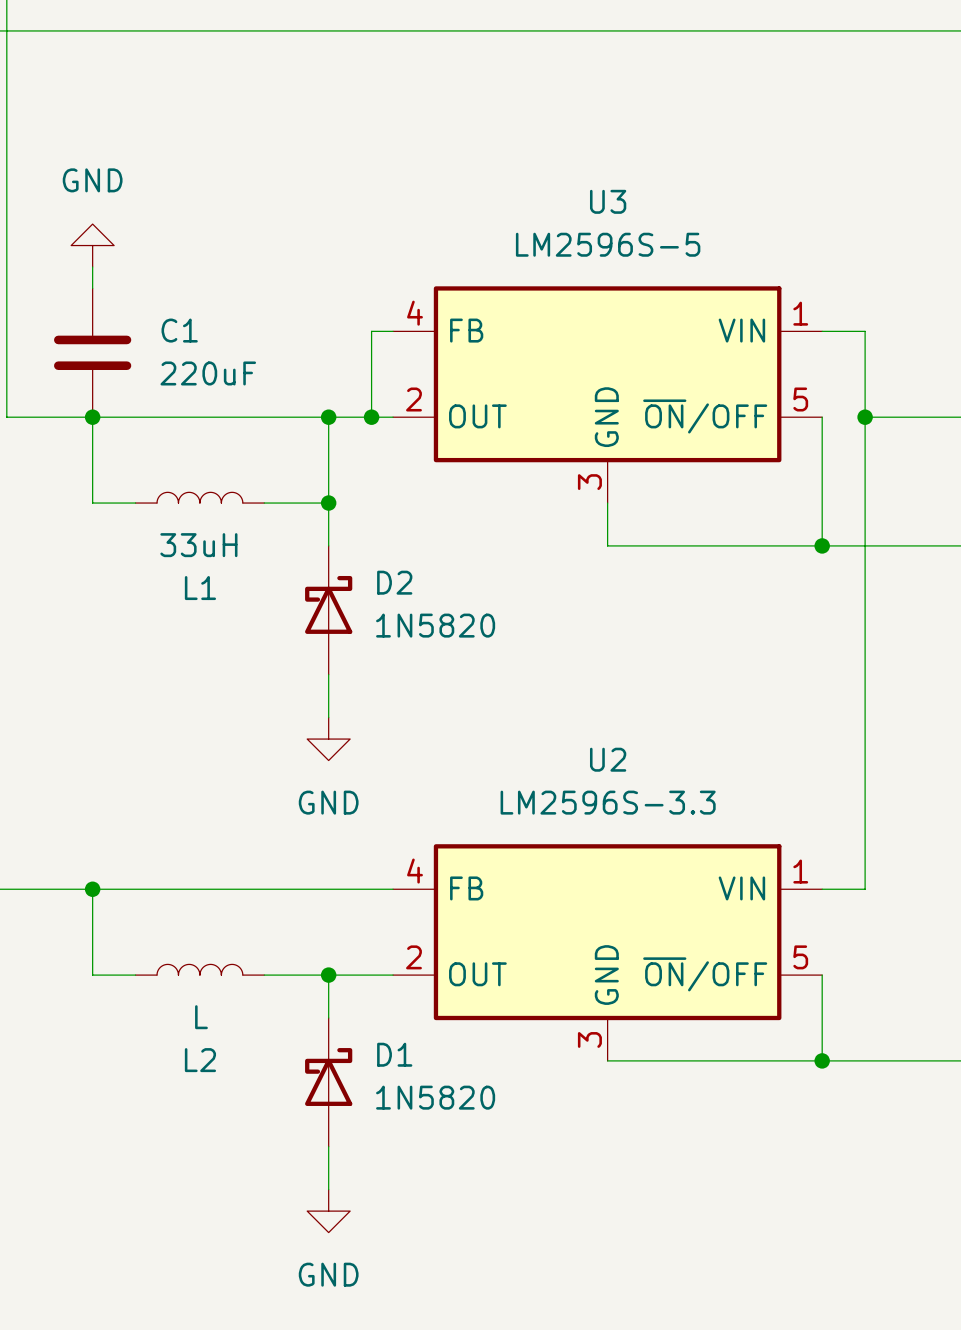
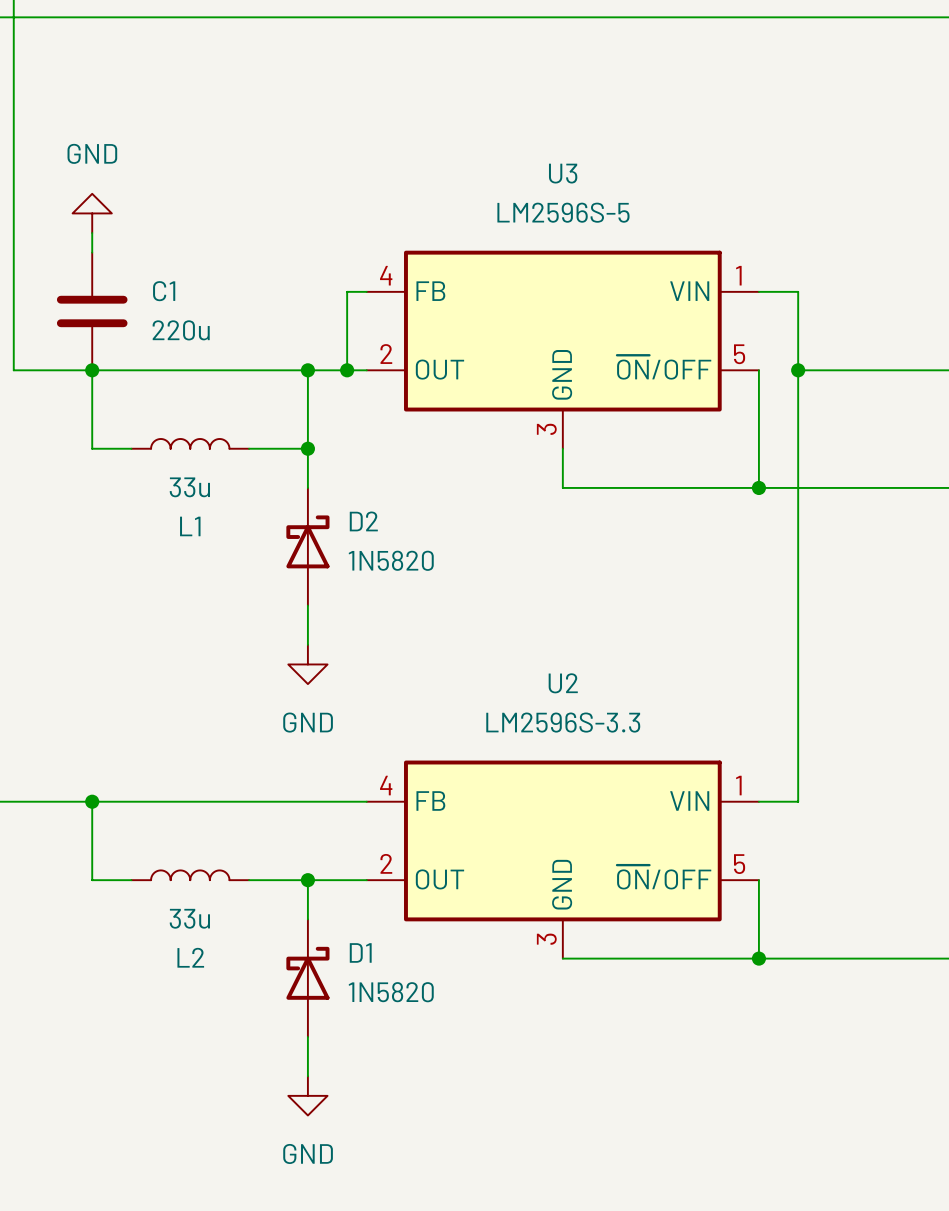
C1 value: 220uF (208, 373) -> 220u (181, 330)
L1 value: 33uH (198, 545) -> 33u (189, 487)
L2 value: L (201, 1017) -> 33u (189, 918)

